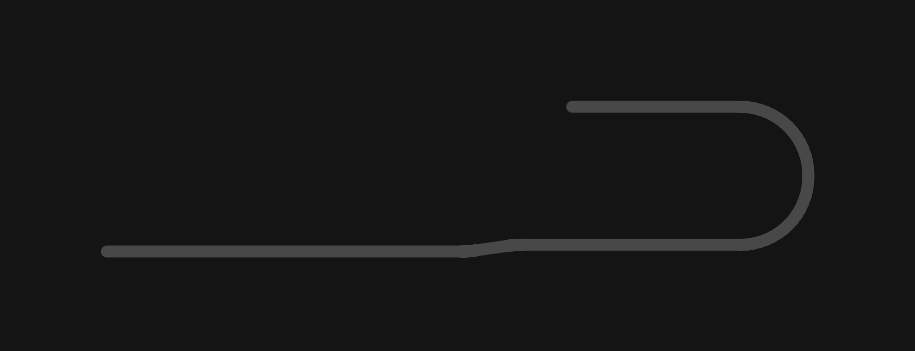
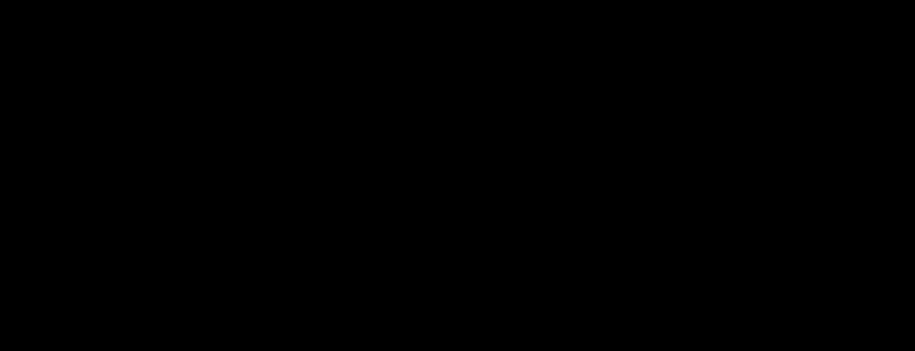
track: (572, 106) (740, 106) (766, 111) (788, 126) (803, 148) (808, 175) (803, 202) (792, 219) (778, 233) (766, 239) (746, 244) (518, 244) (462, 251) (106, 251) -> none

